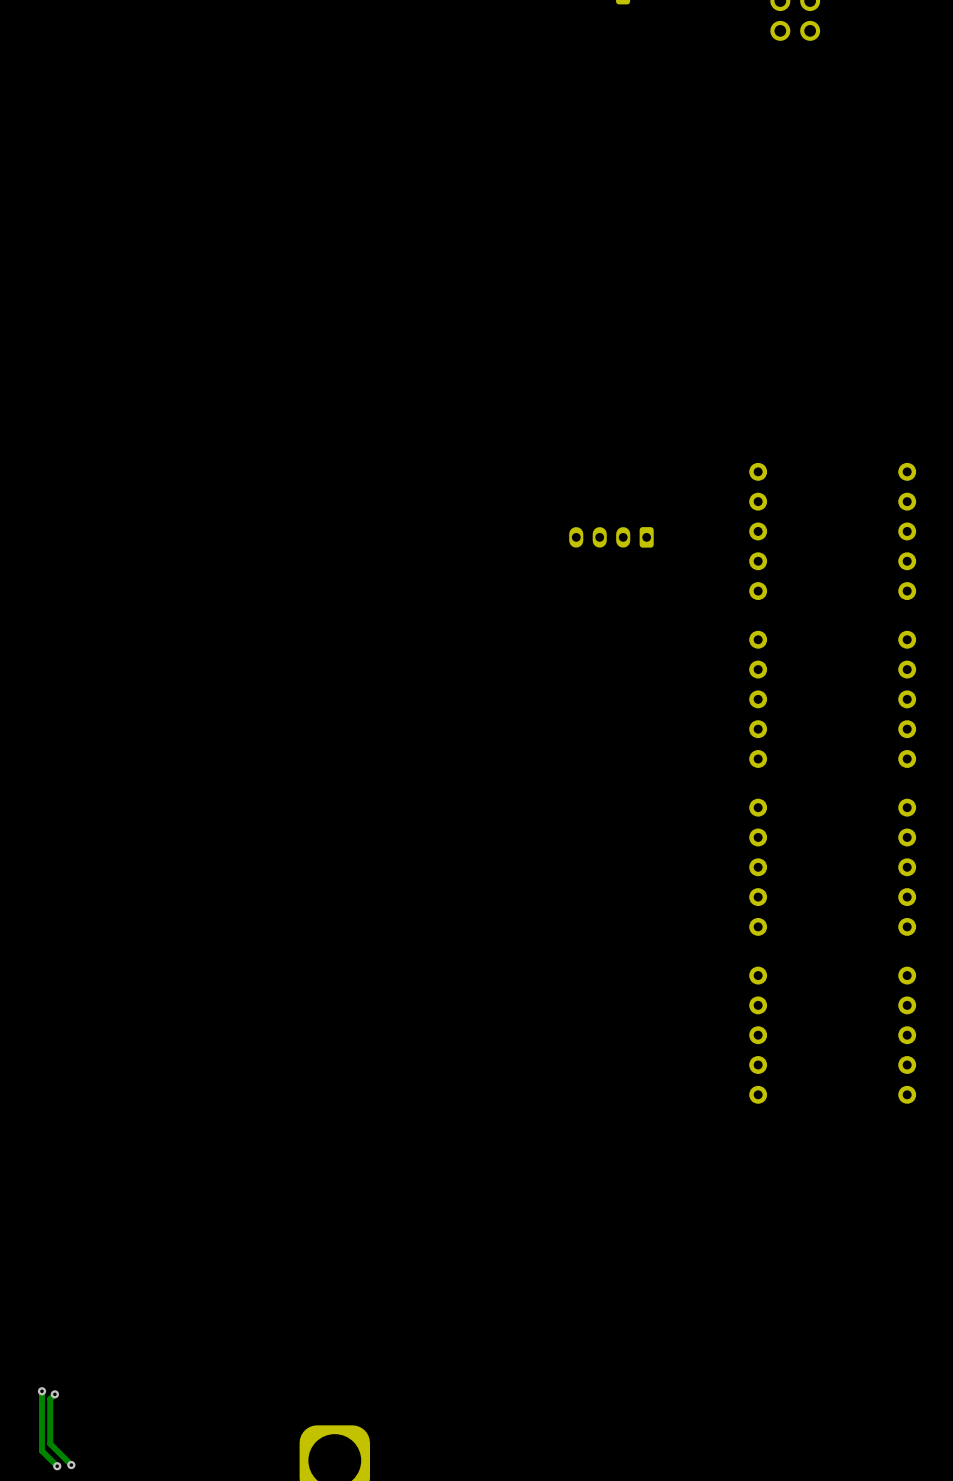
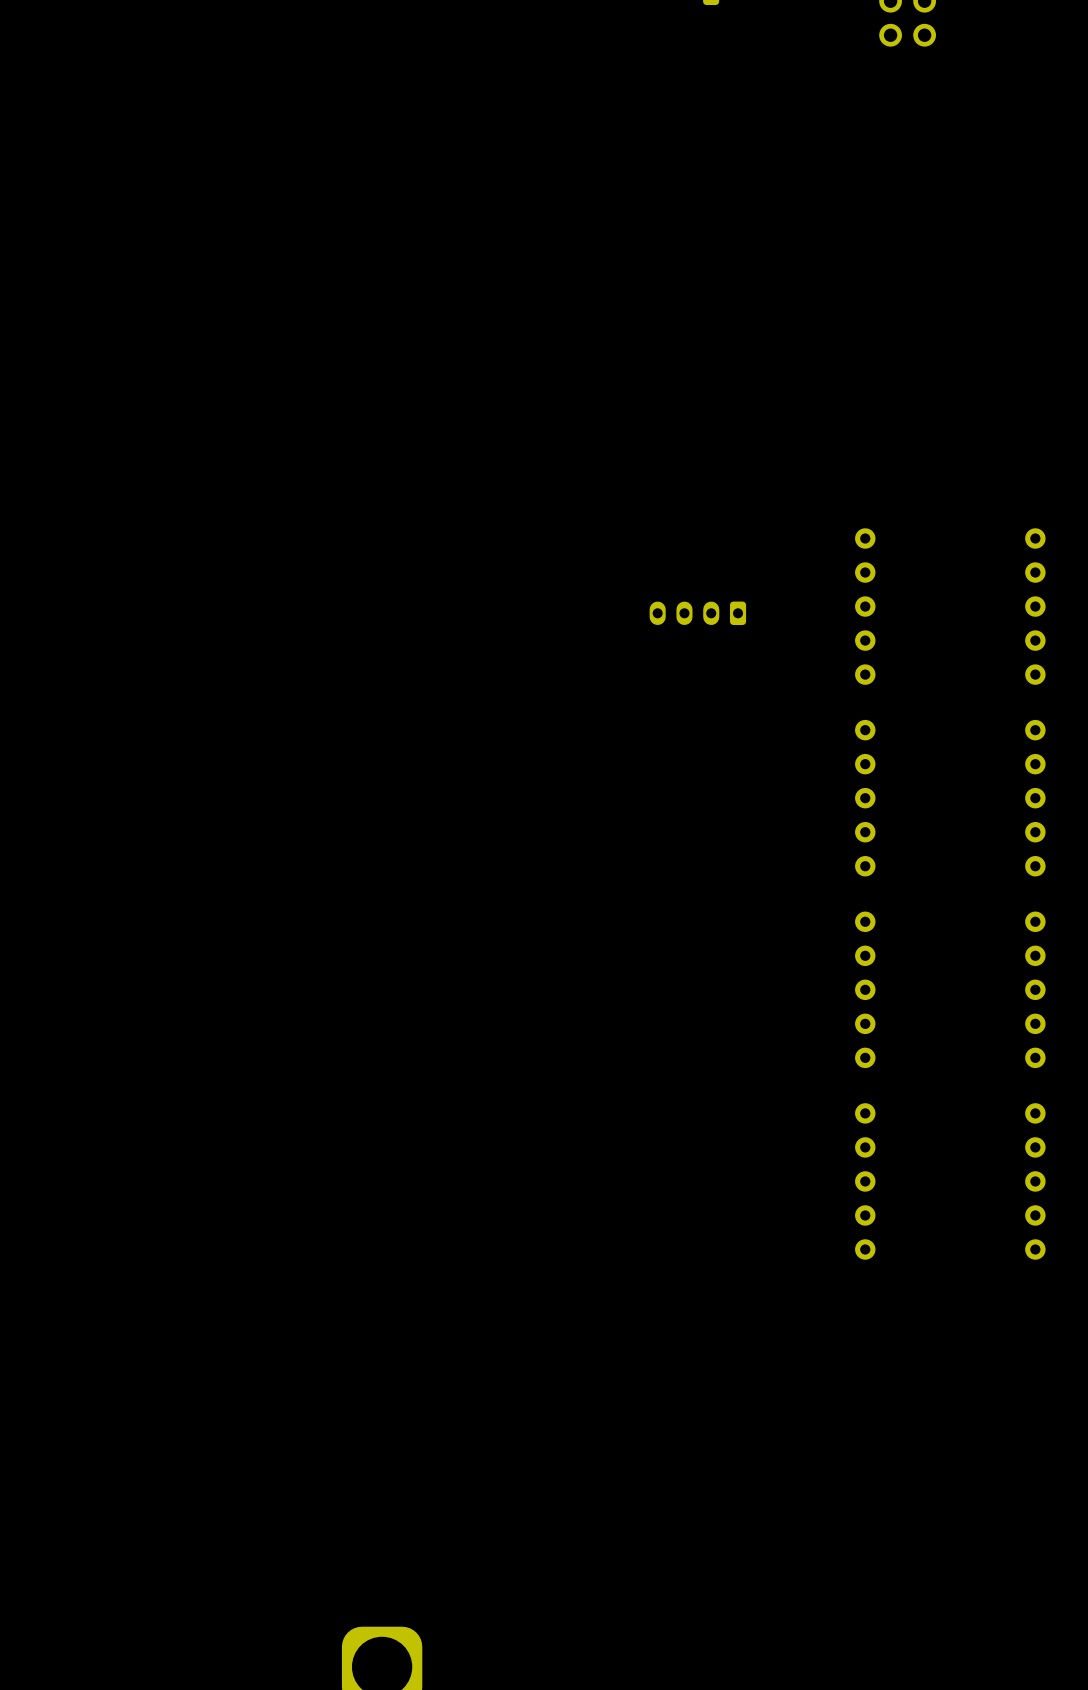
track: (41, 1391) (41, 1450) (57, 1466) -> none
via: (41, 1391) -> none
track: (54, 1394) (50, 1399) (50, 1443) (71, 1465) -> none
via: (54, 1394) -> none
via: (71, 1465) -> none
via: (57, 1466) -> none

